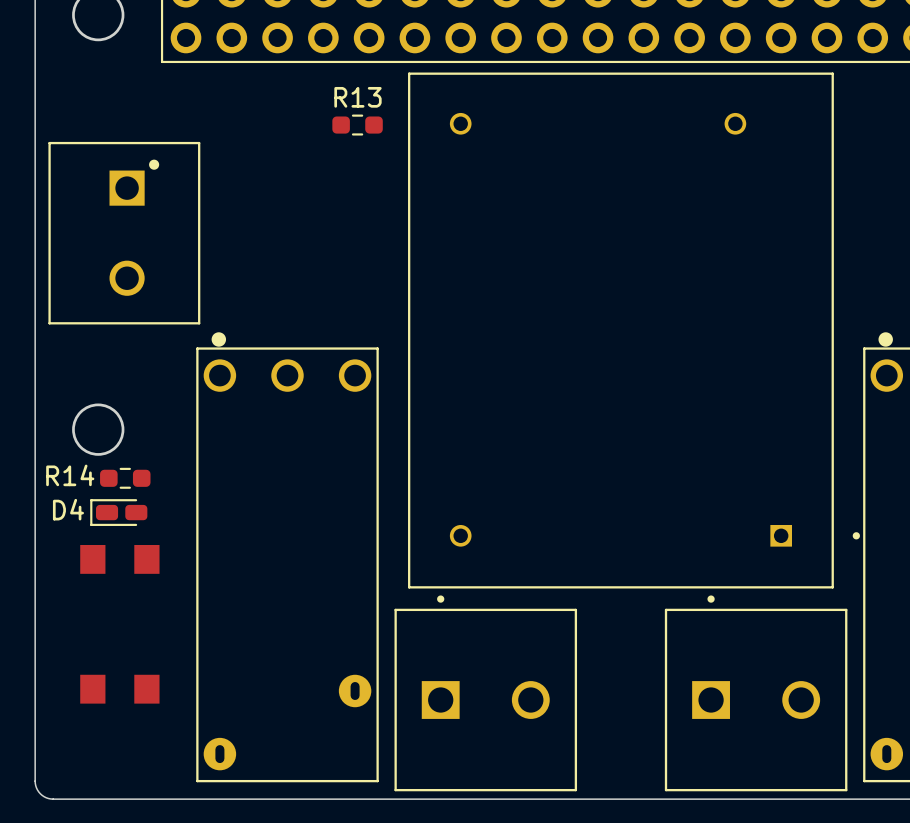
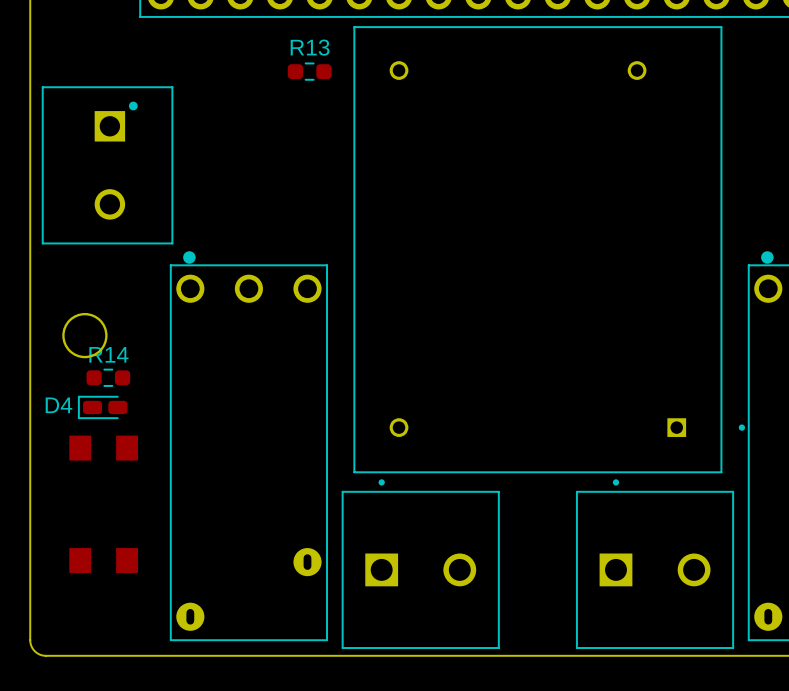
R14 name position: R14 (70, 475) -> R14 (108, 354)

